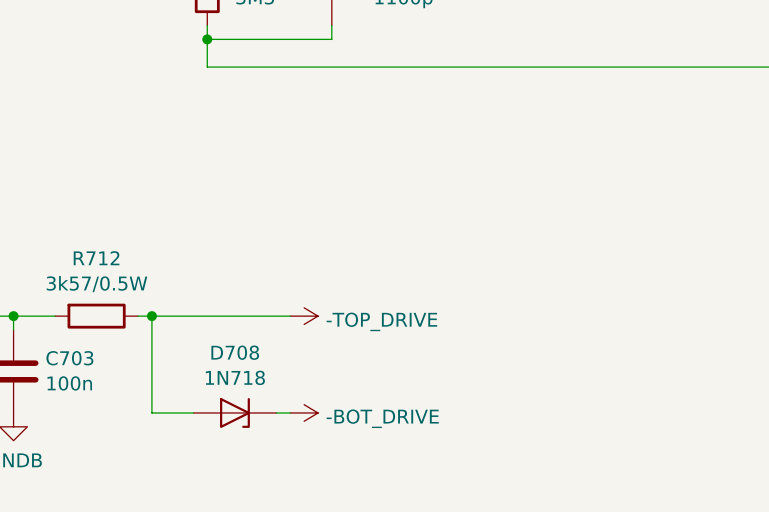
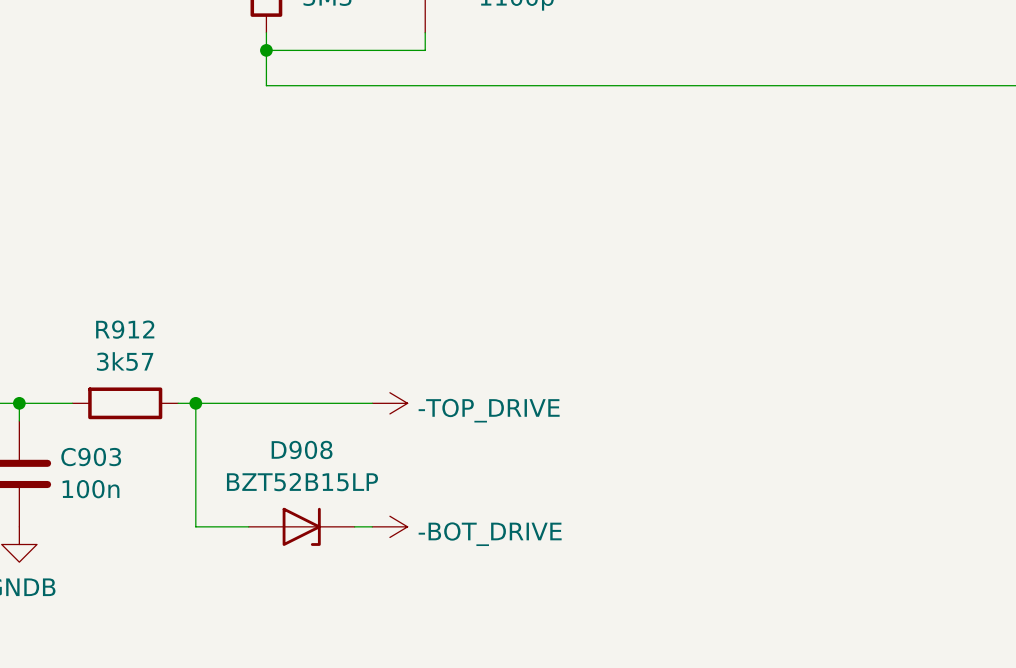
R712 name: R712 (96, 258) -> R912 (125, 329)
R712 value: 3k57/0.5W (97, 284) -> 3k57 (125, 361)
D708 name: D708 (235, 352) -> D908 (302, 449)
C703 name: C703 (69, 358) -> C903 (91, 457)
D708 value: 1N718 (235, 377) -> BZT52B15LP (302, 482)

